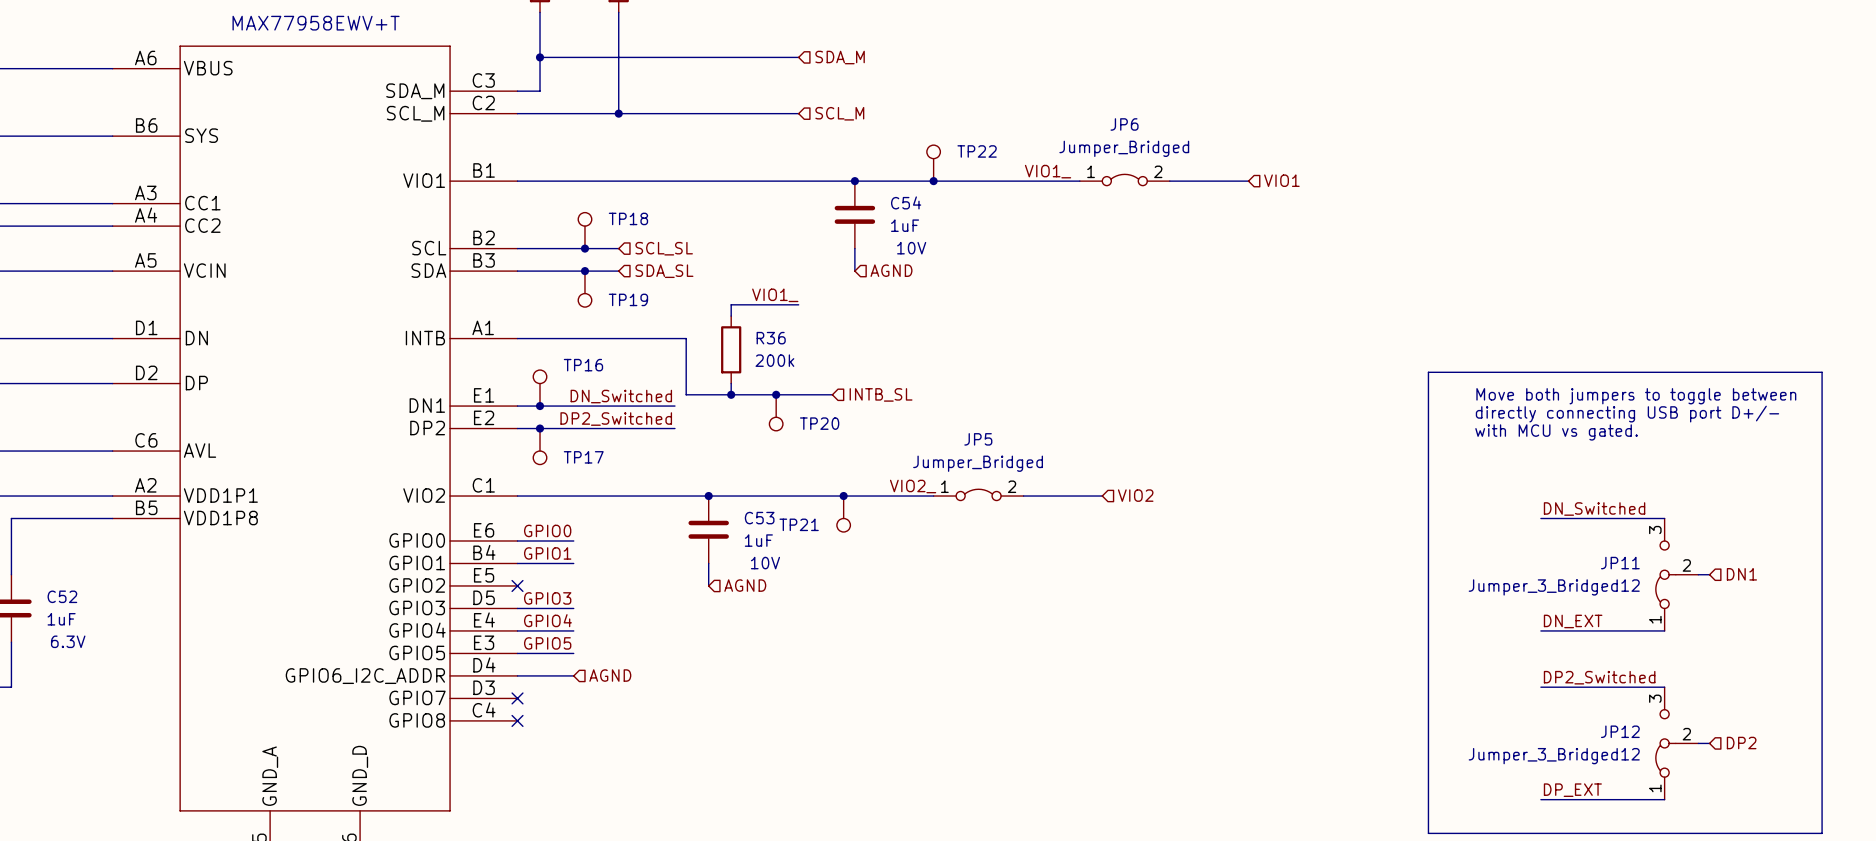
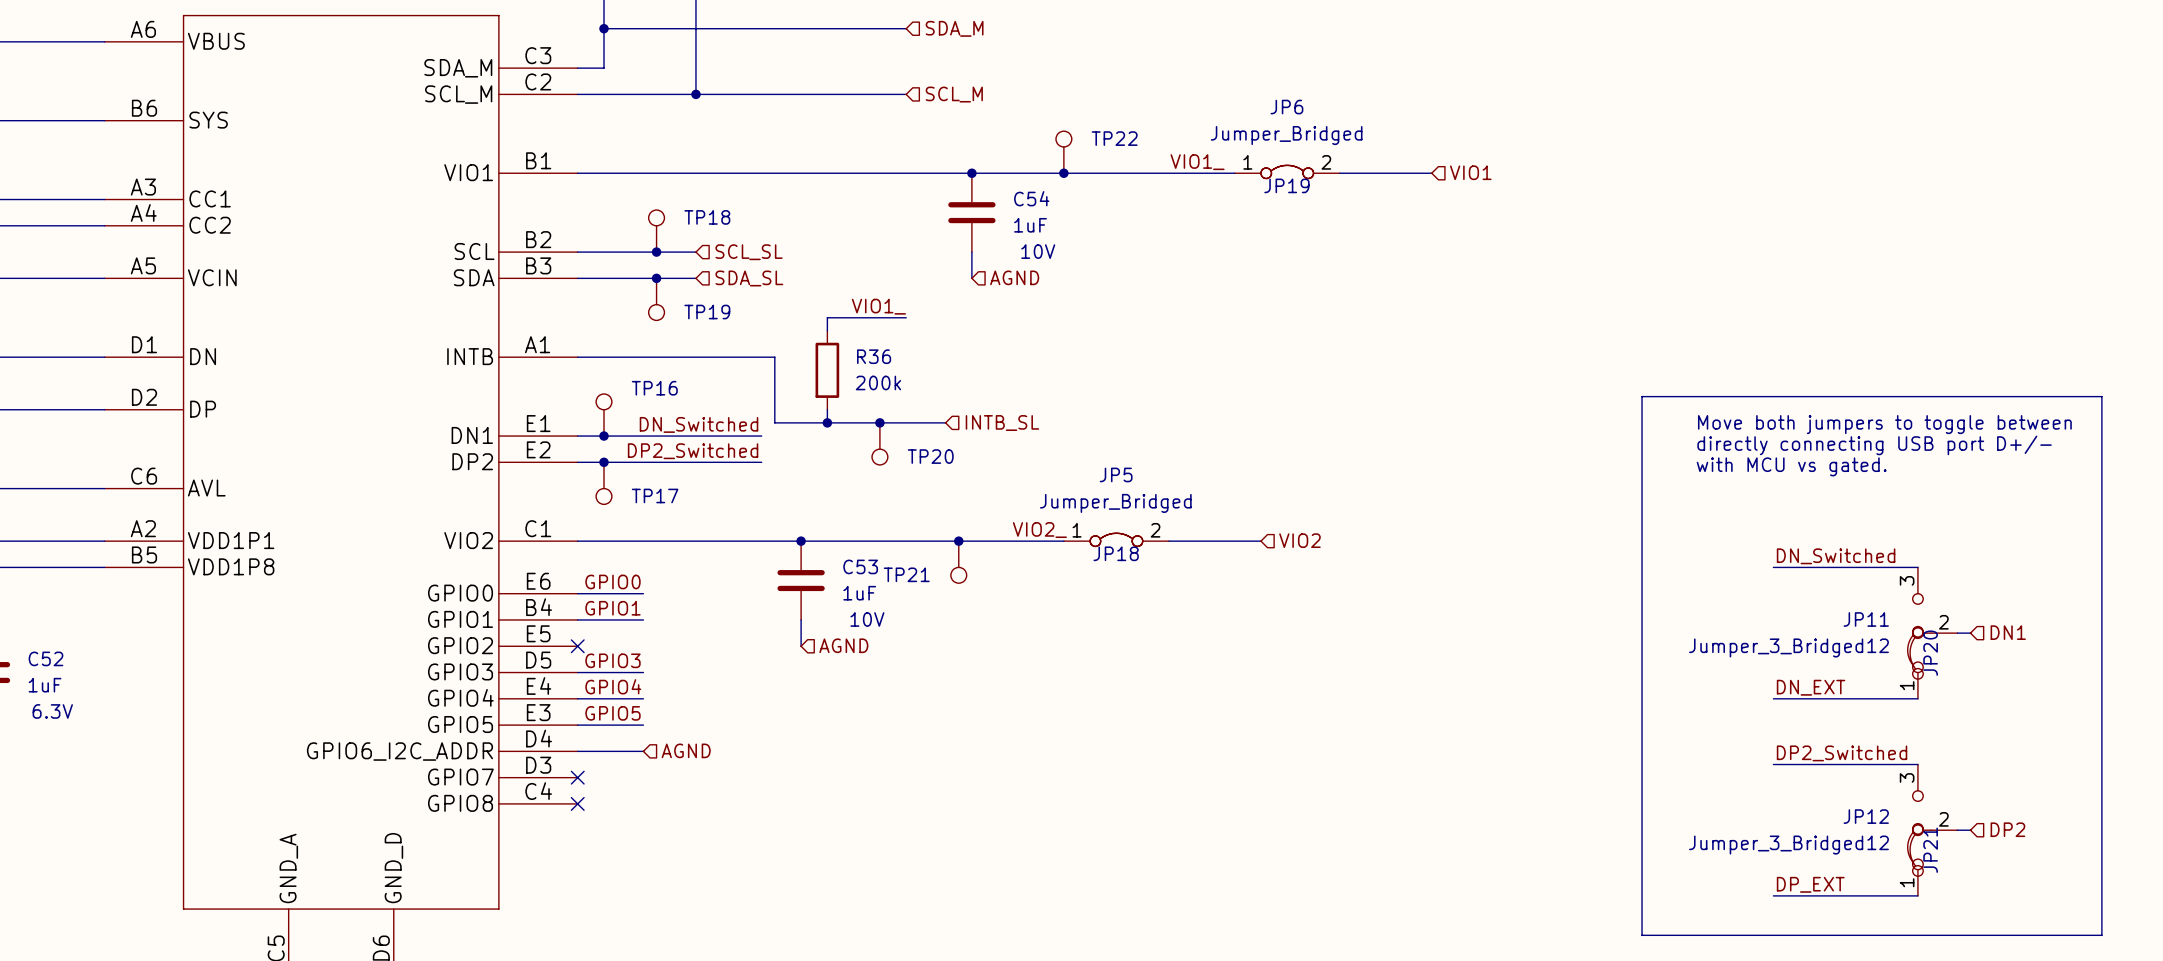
JP19: none -> (1287, 171)
JP18: none -> (1116, 539)
JP20: none -> (1916, 652)
JP21: none -> (1916, 849)

